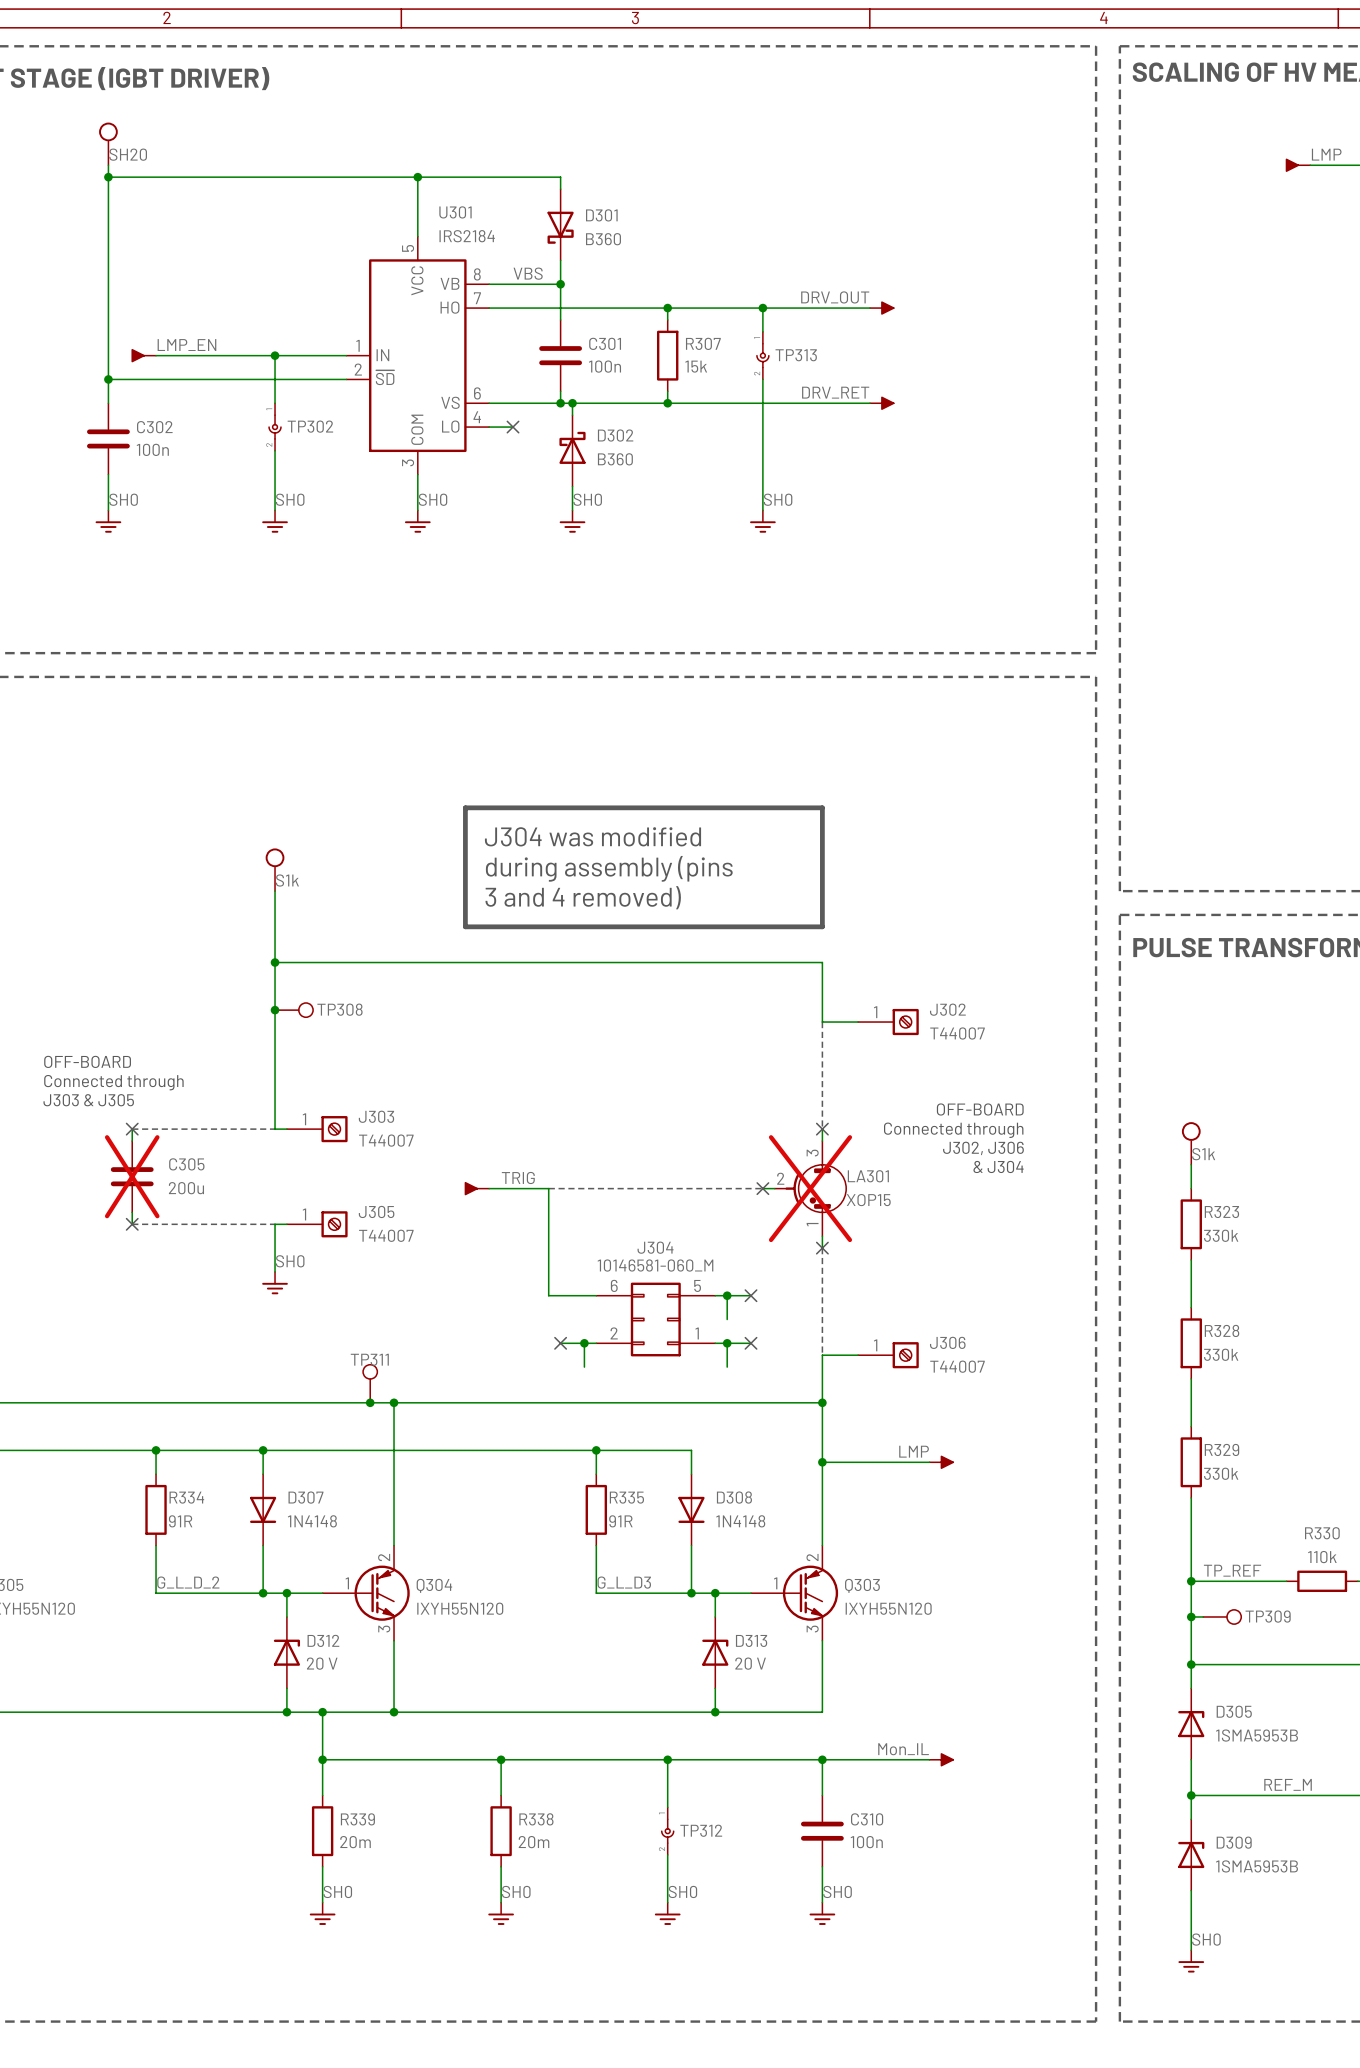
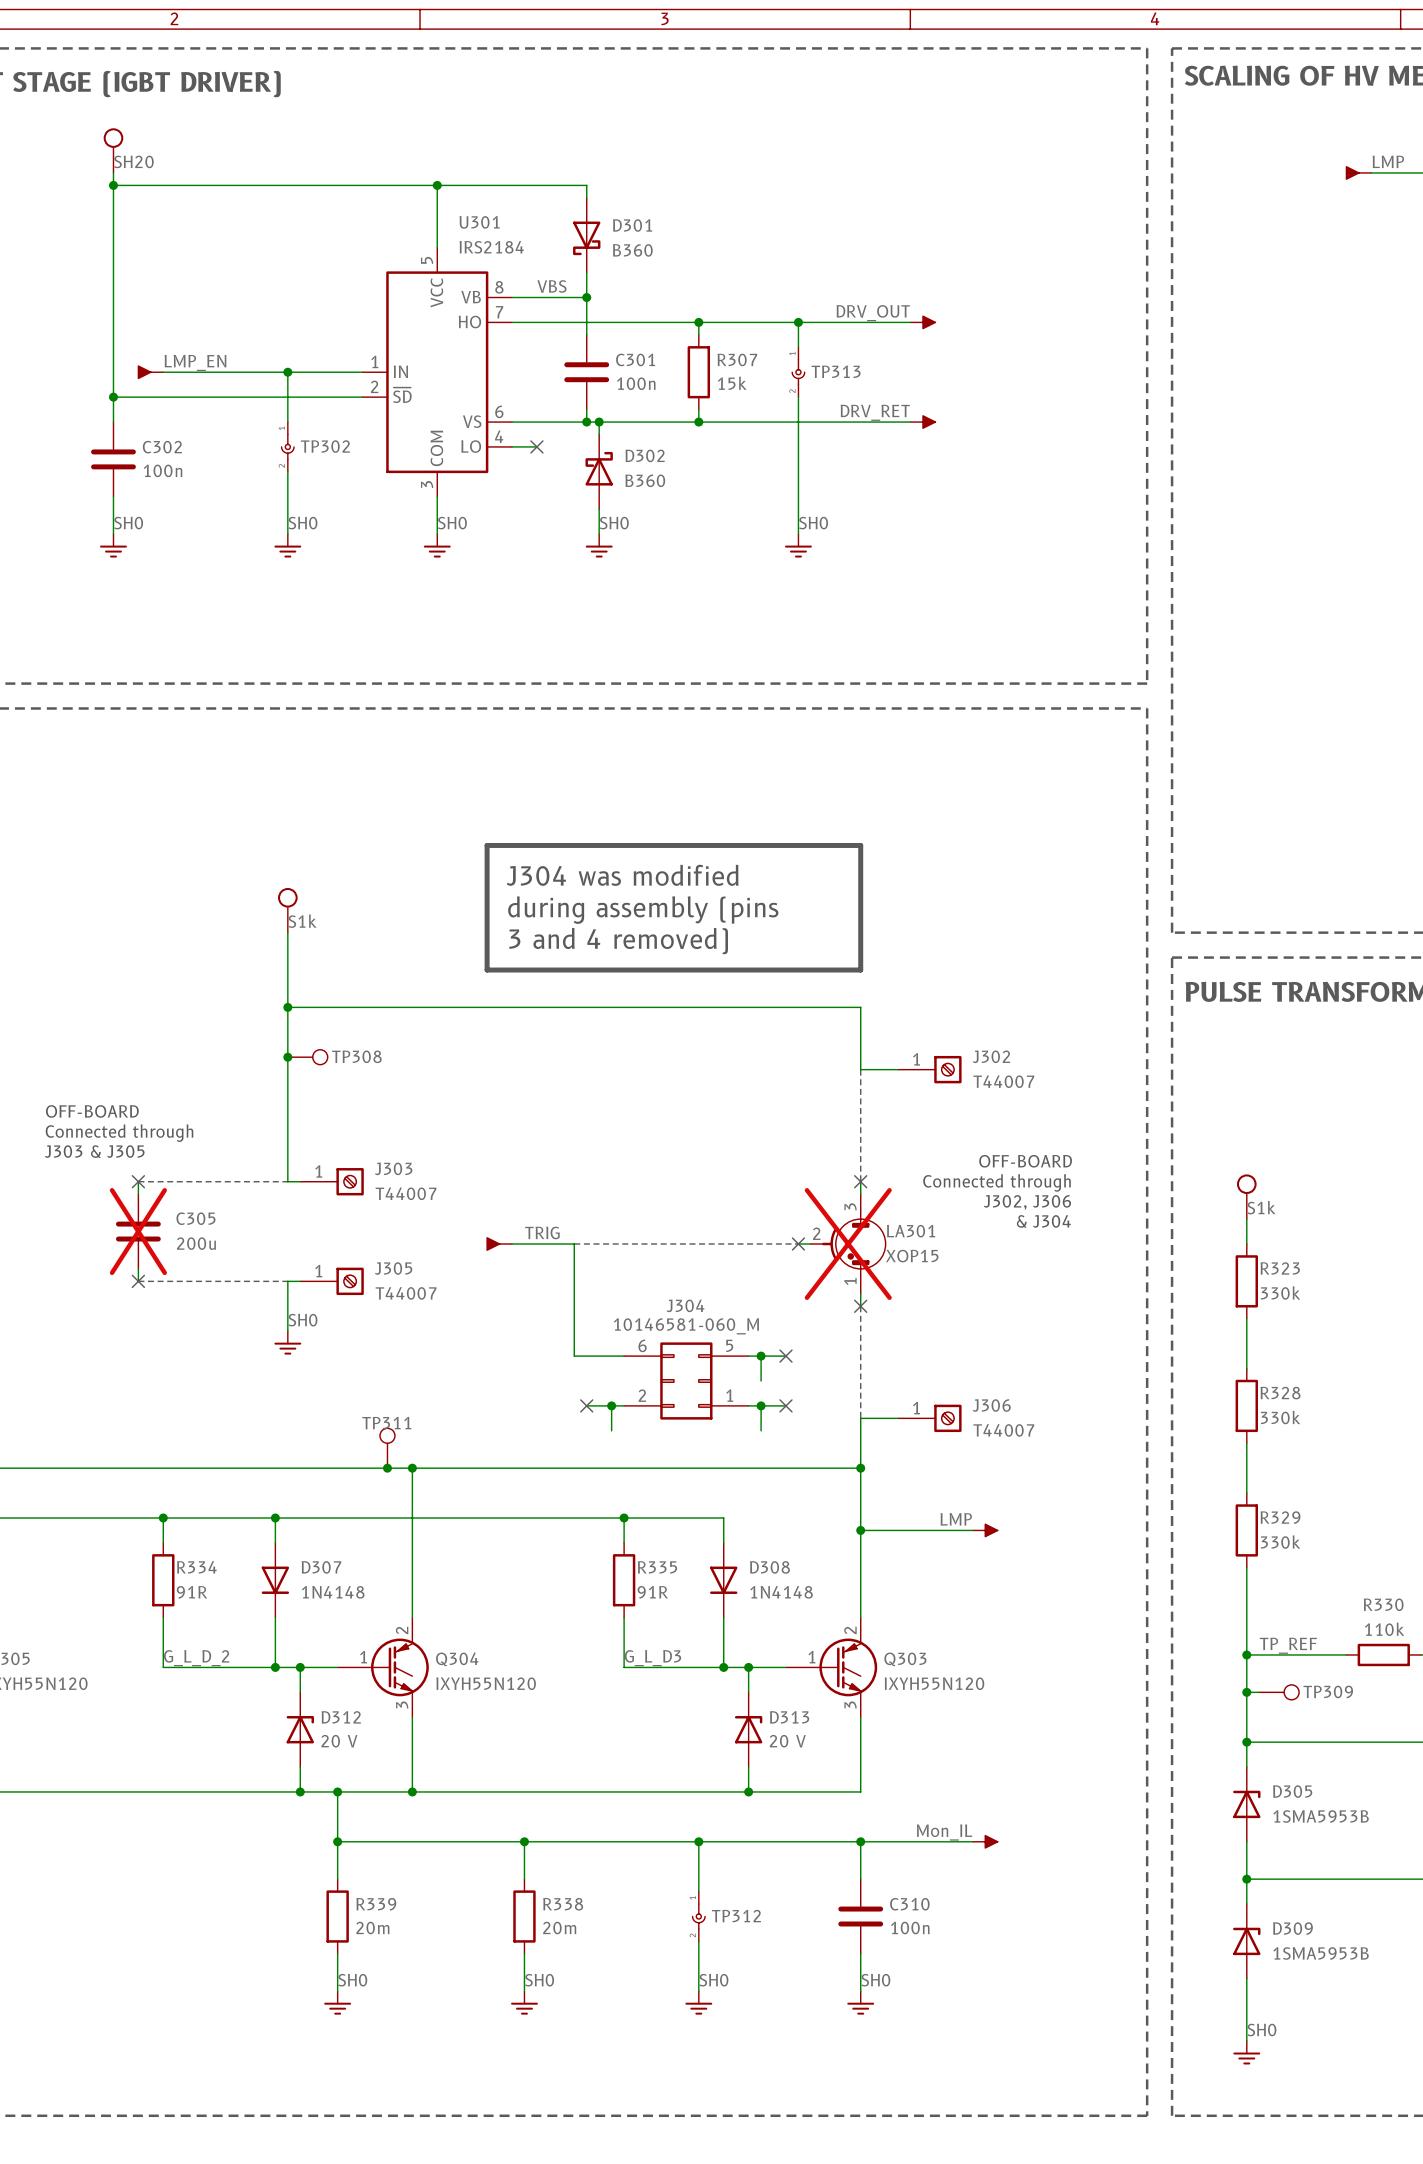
label: REF_M (1288, 1784) -> none

